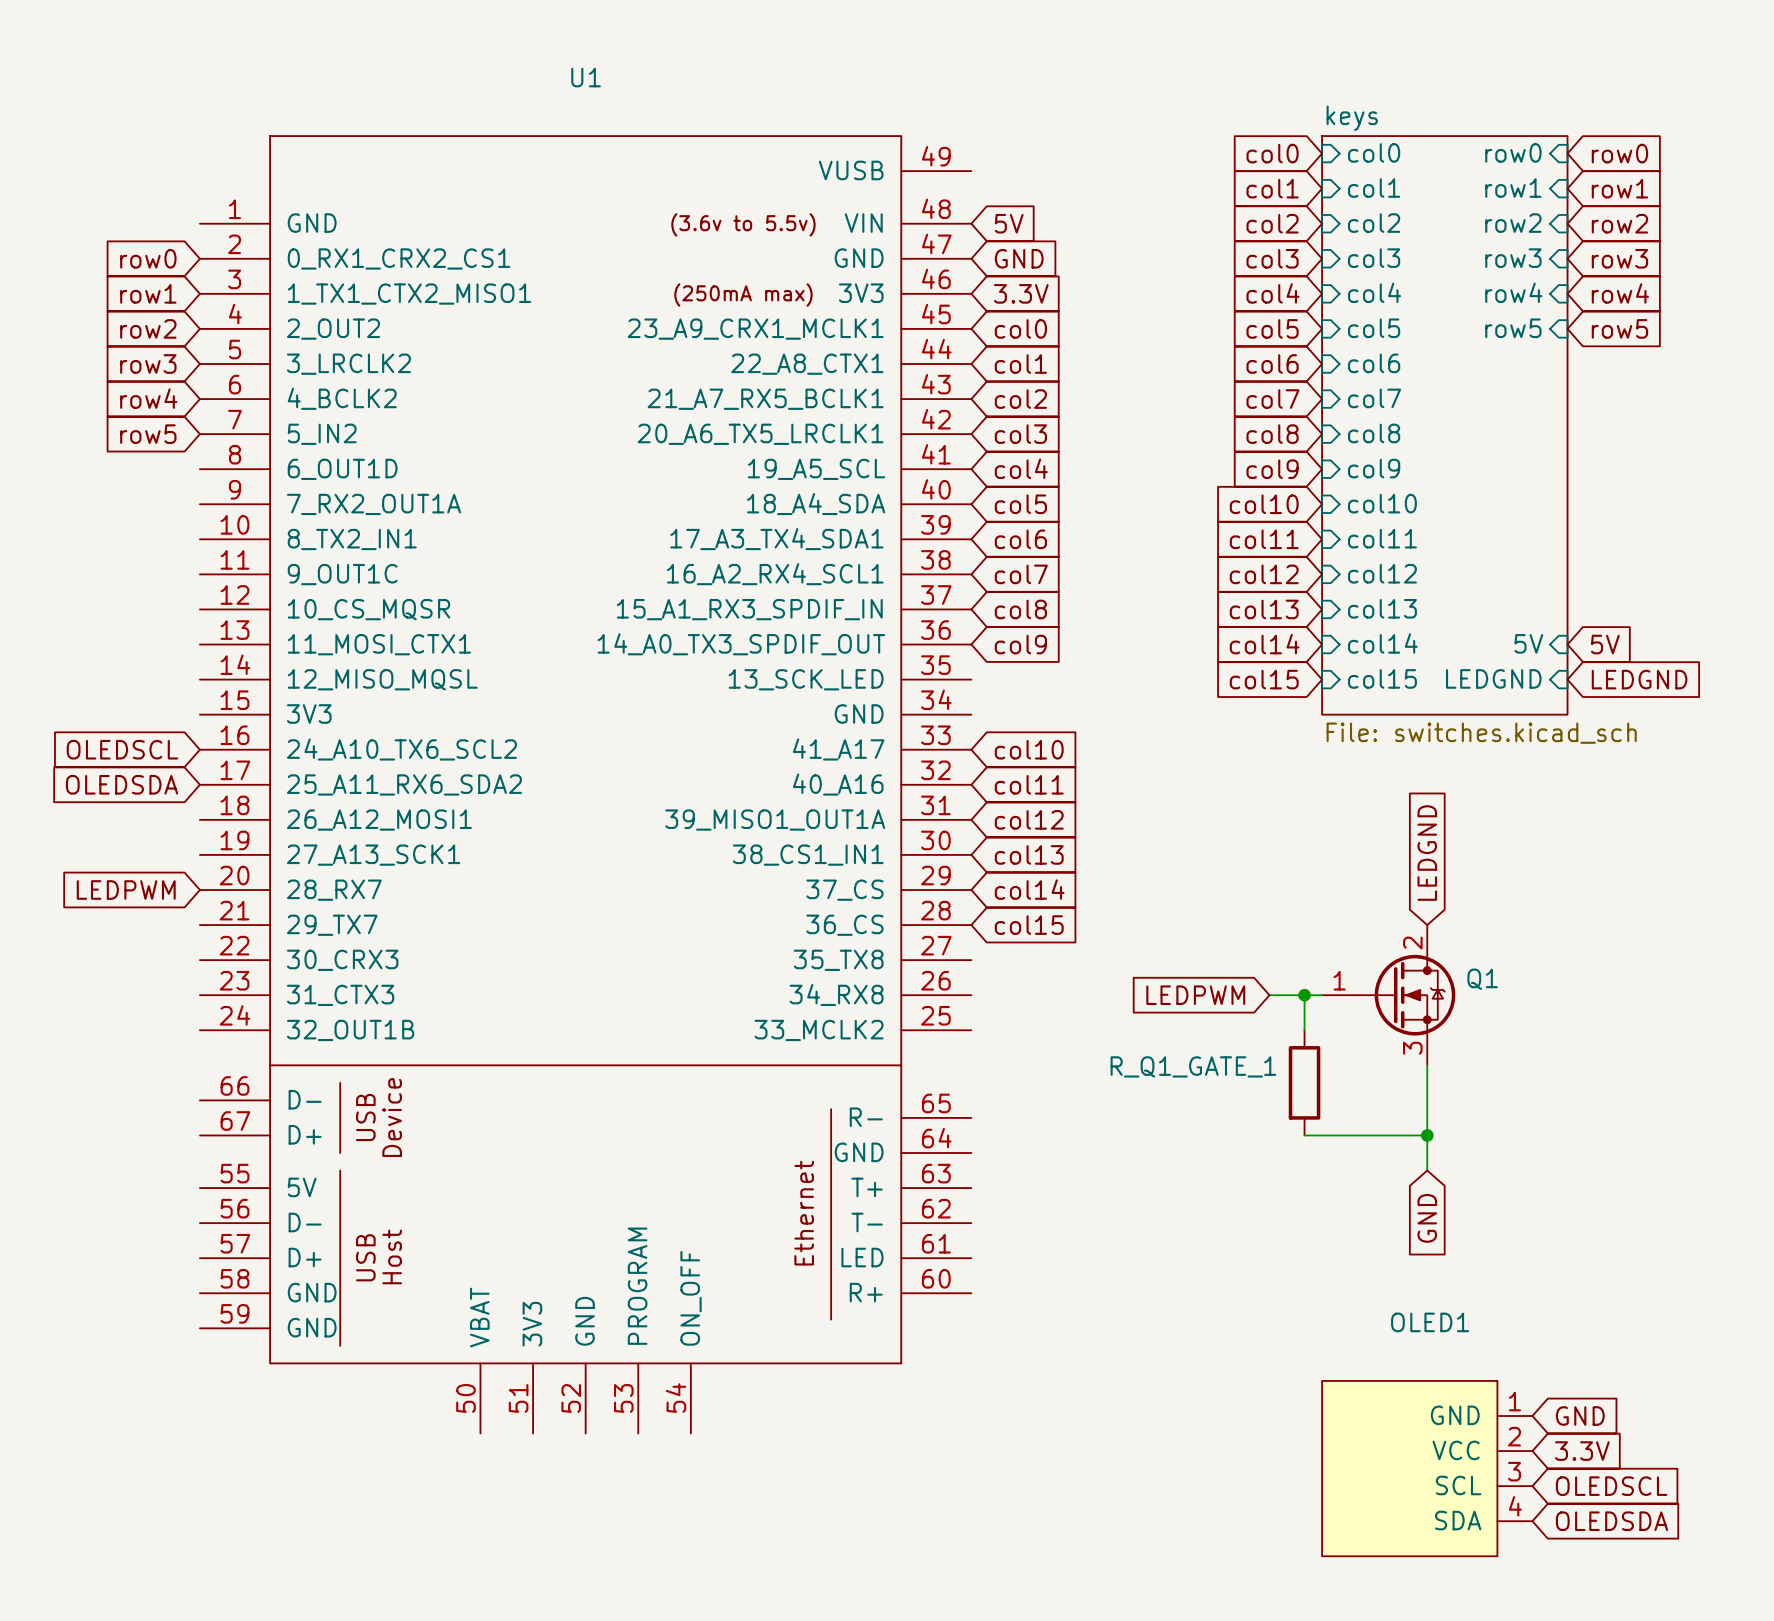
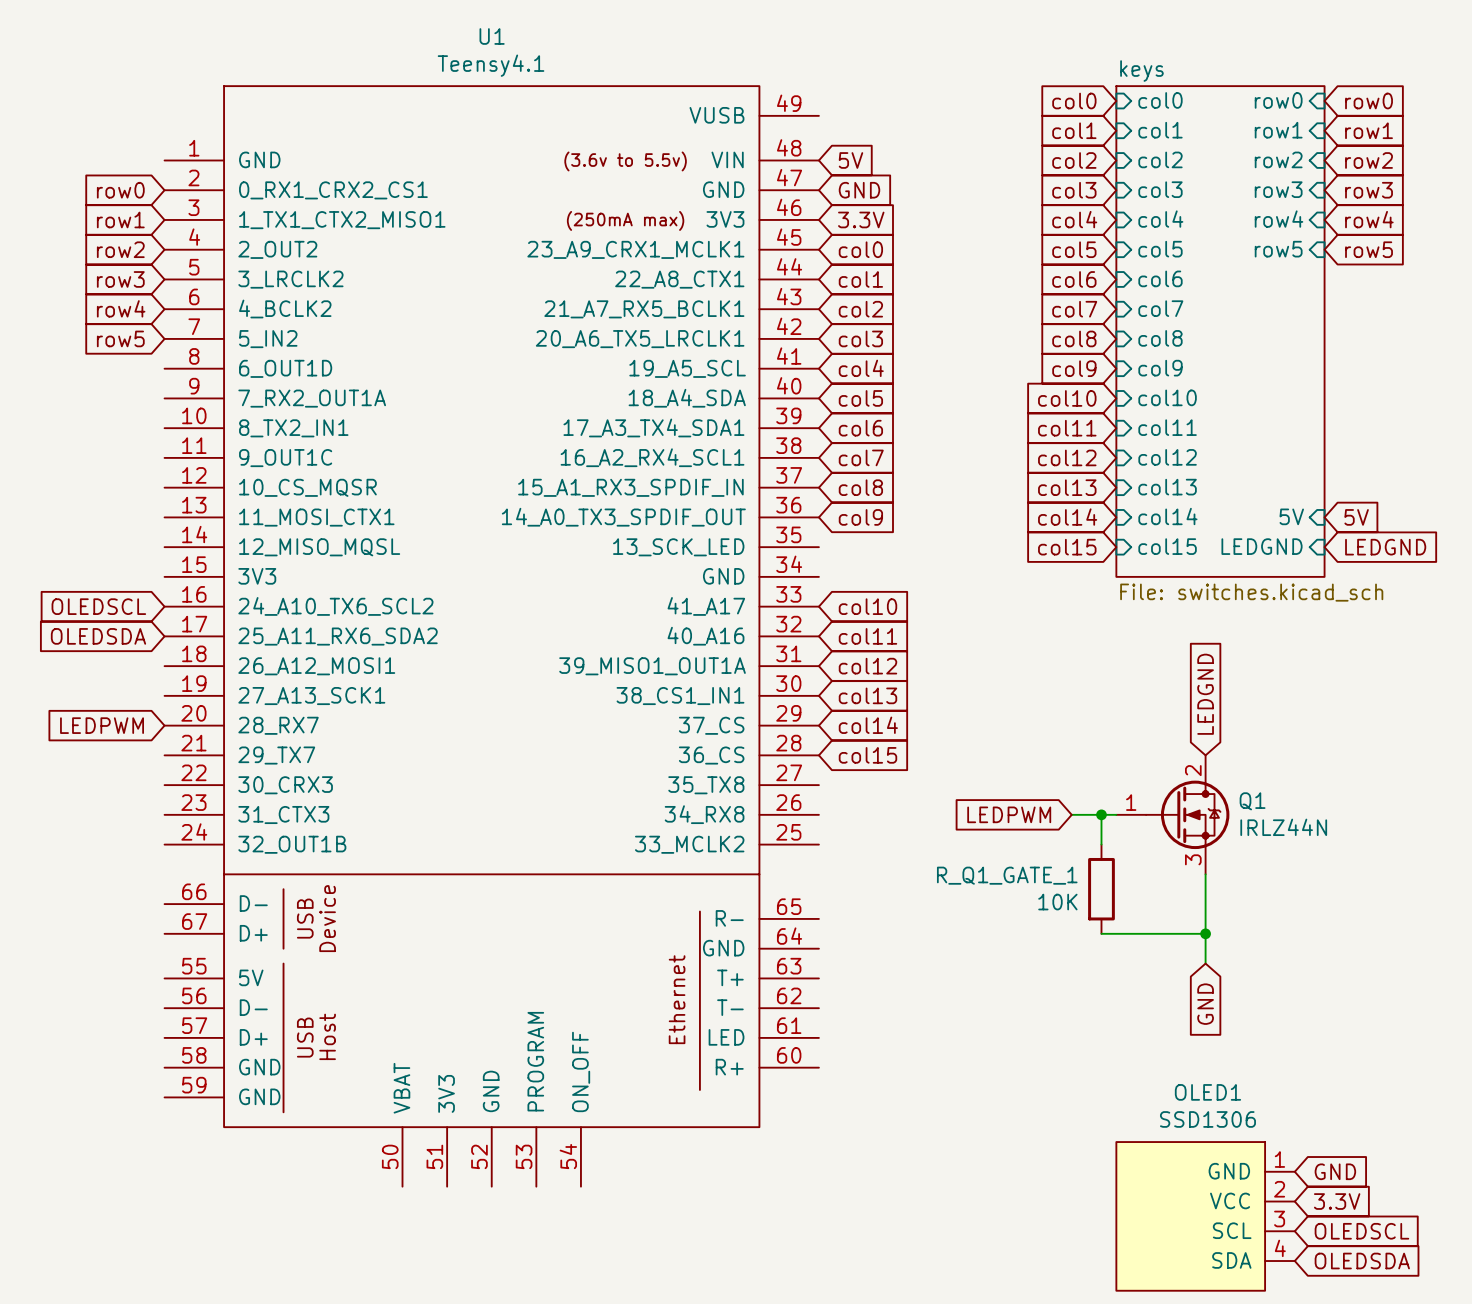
U1 value: none -> Teensy4.1 (491, 65)
Q1 value: none -> IRLZ44N (1283, 827)
R_Q1_GATE_1 value: none -> 10K (1057, 902)
OLED1 value: none -> SSD1306 (1207, 1119)

